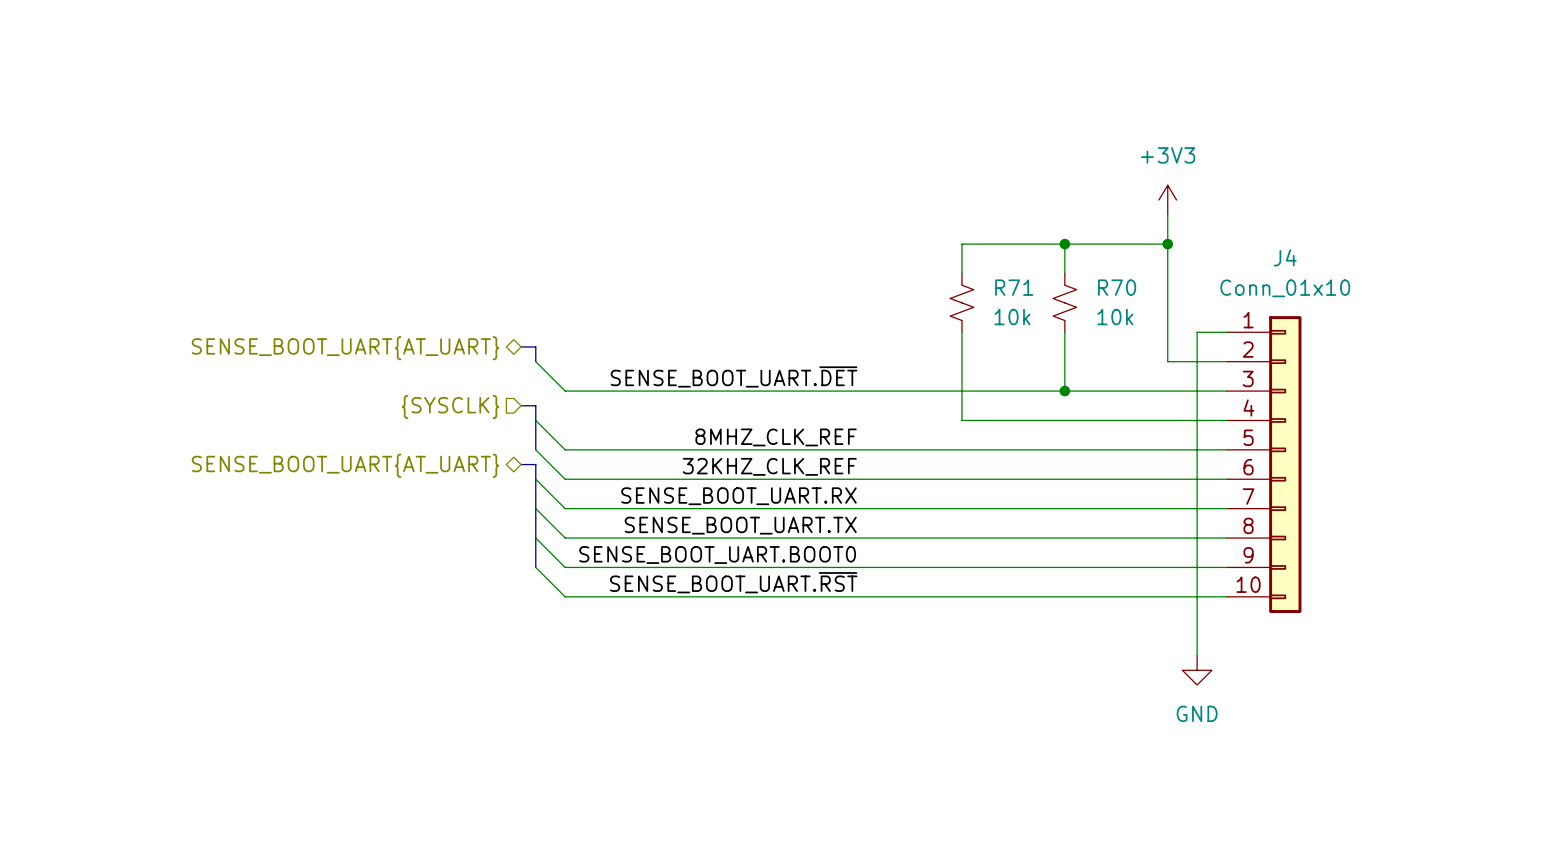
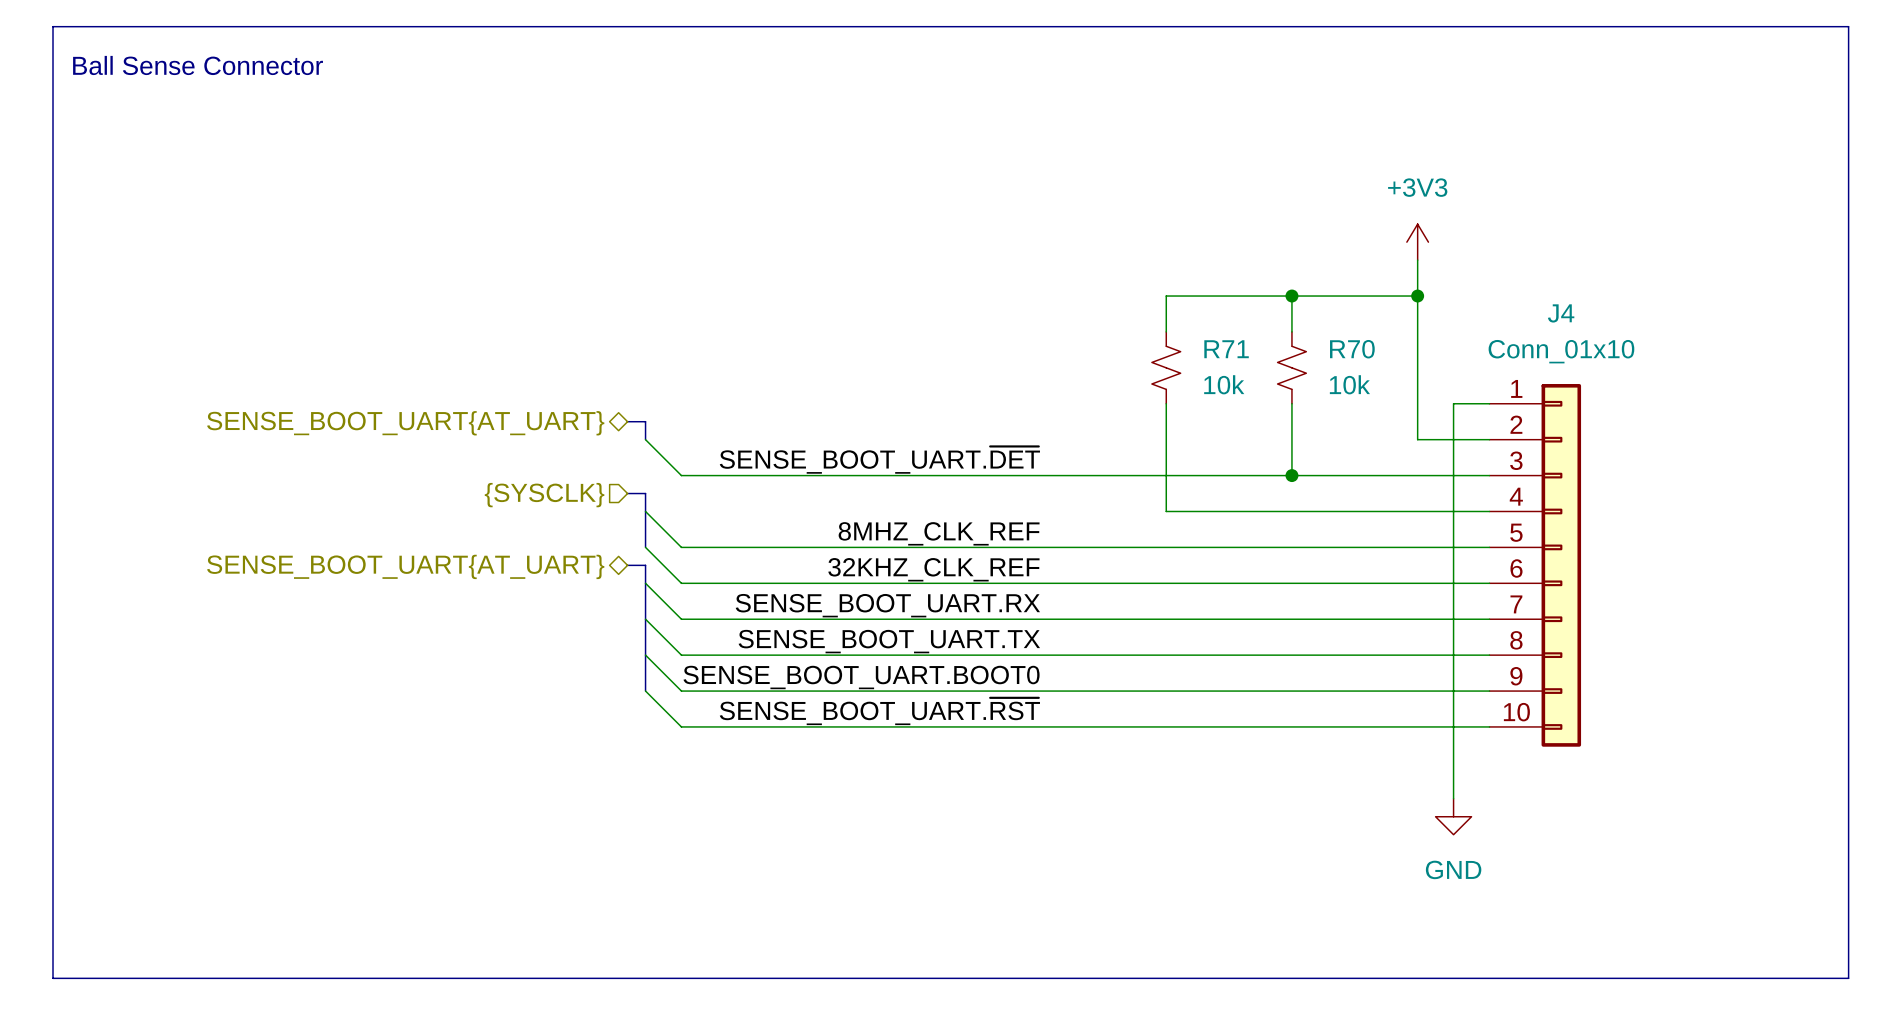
line: none -> (53, 26) (1848, 26) (1848, 978) (53, 978) (53, 26)
text: none -> Ball Sense Connector (198, 65)

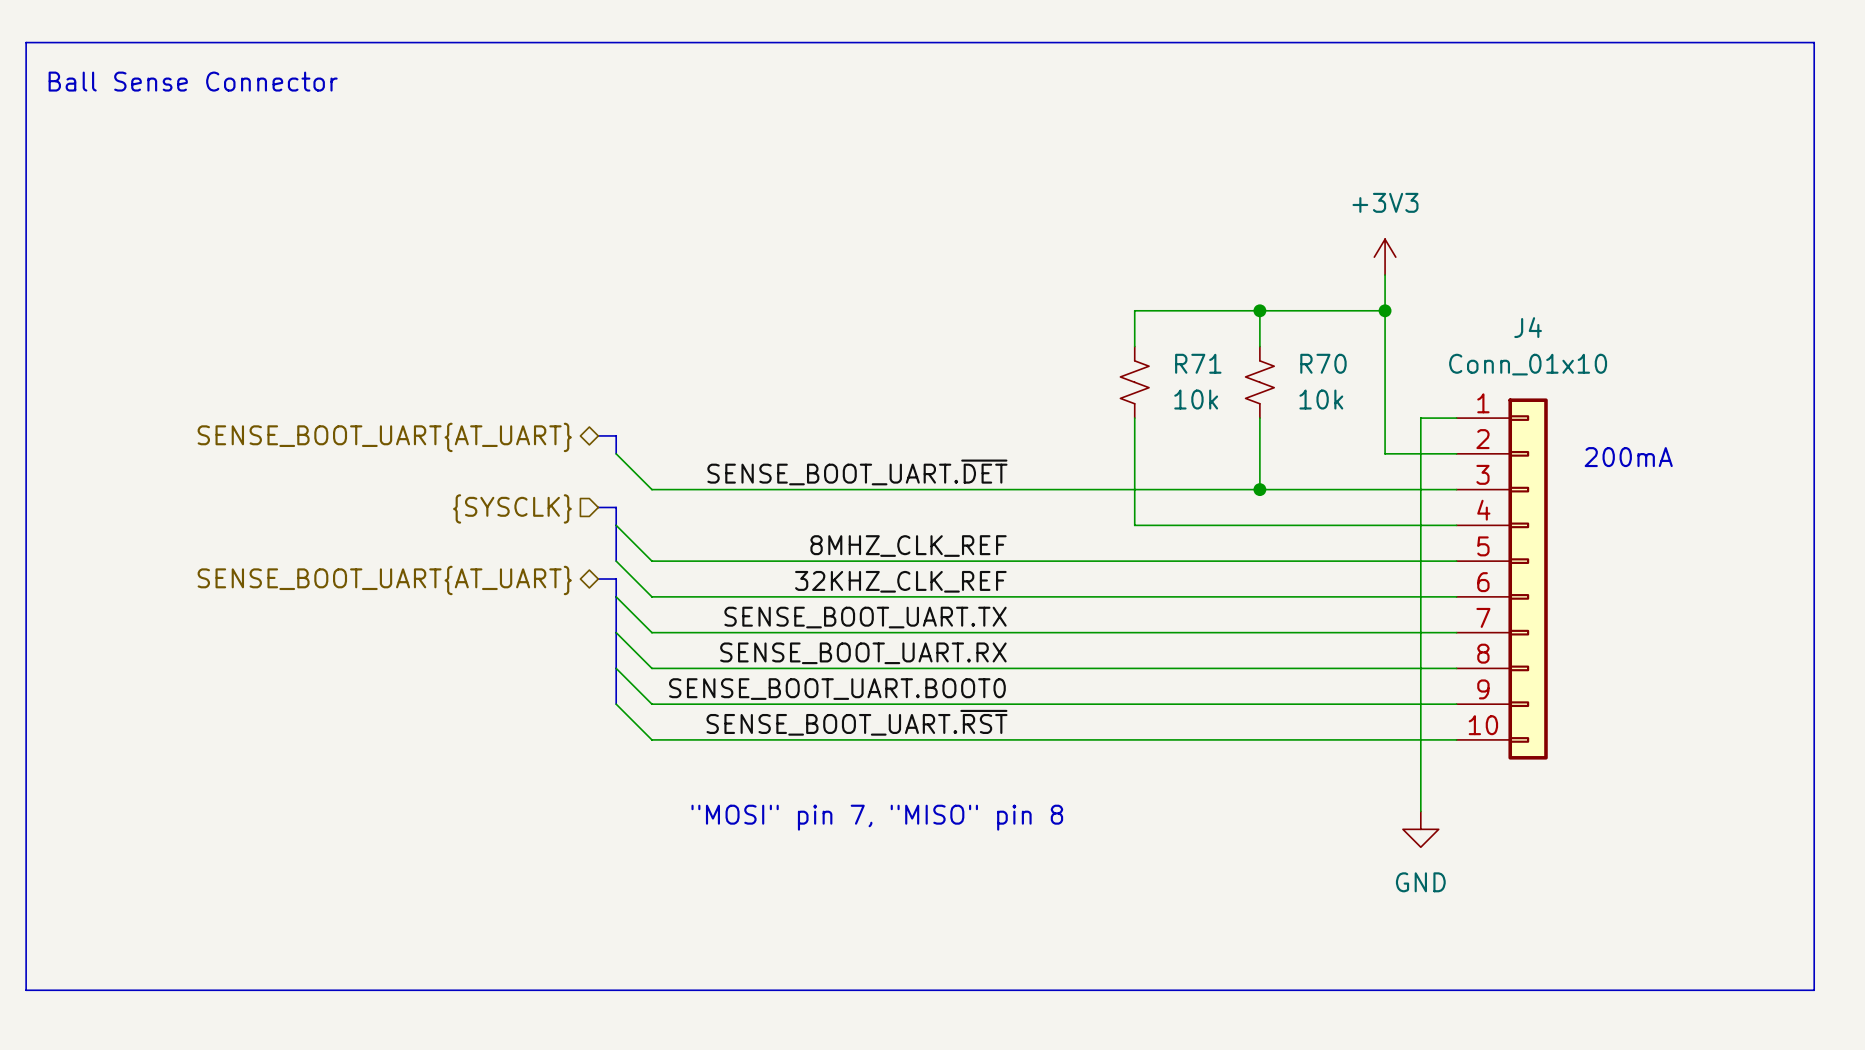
text: none -> 200mA (1628, 457)
label: SENSE_BOOT_UART.RX (887, 605) -> SENSE_BOOT_UART.TX (865, 617)
label: SENSE_BOOT_UART.TX (889, 641) -> SENSE_BOOT_UART.RX (863, 653)
text: none -> "MOSI" pin 7, "MISO" pin 8 (877, 817)

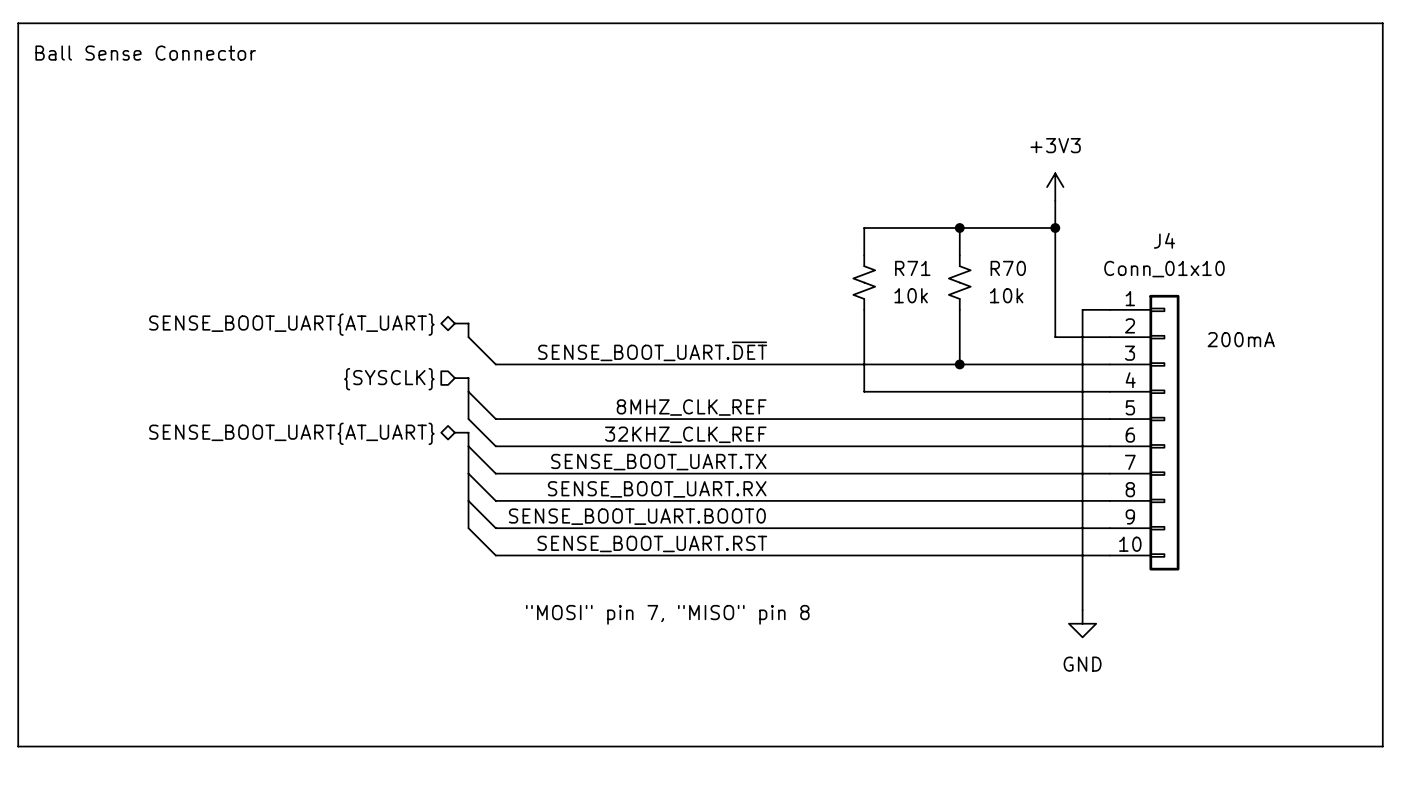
label: SENSE_BOOT_UART.~{RST} (857, 722) -> SENSE_BOOT_UART.RST (652, 543)

